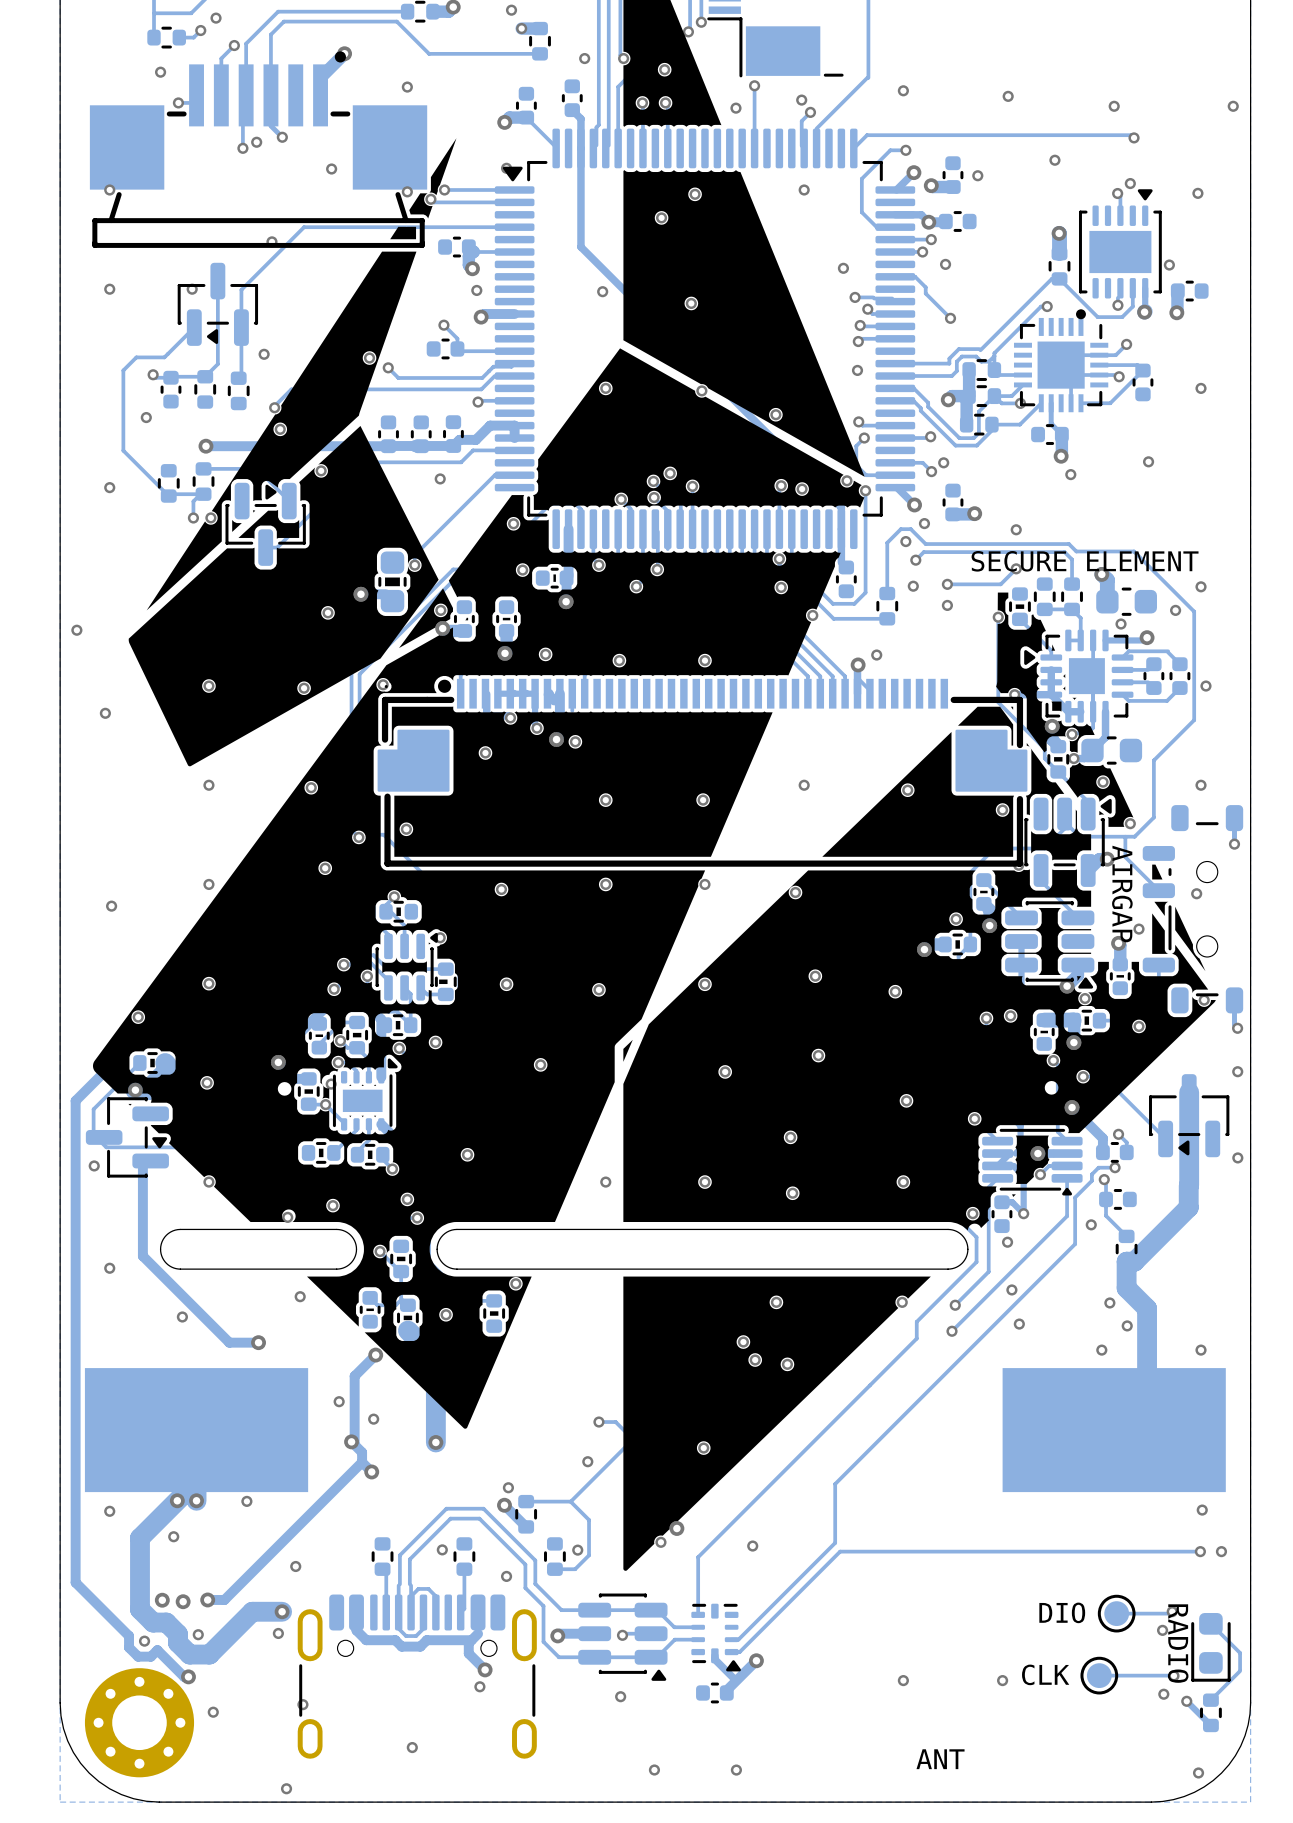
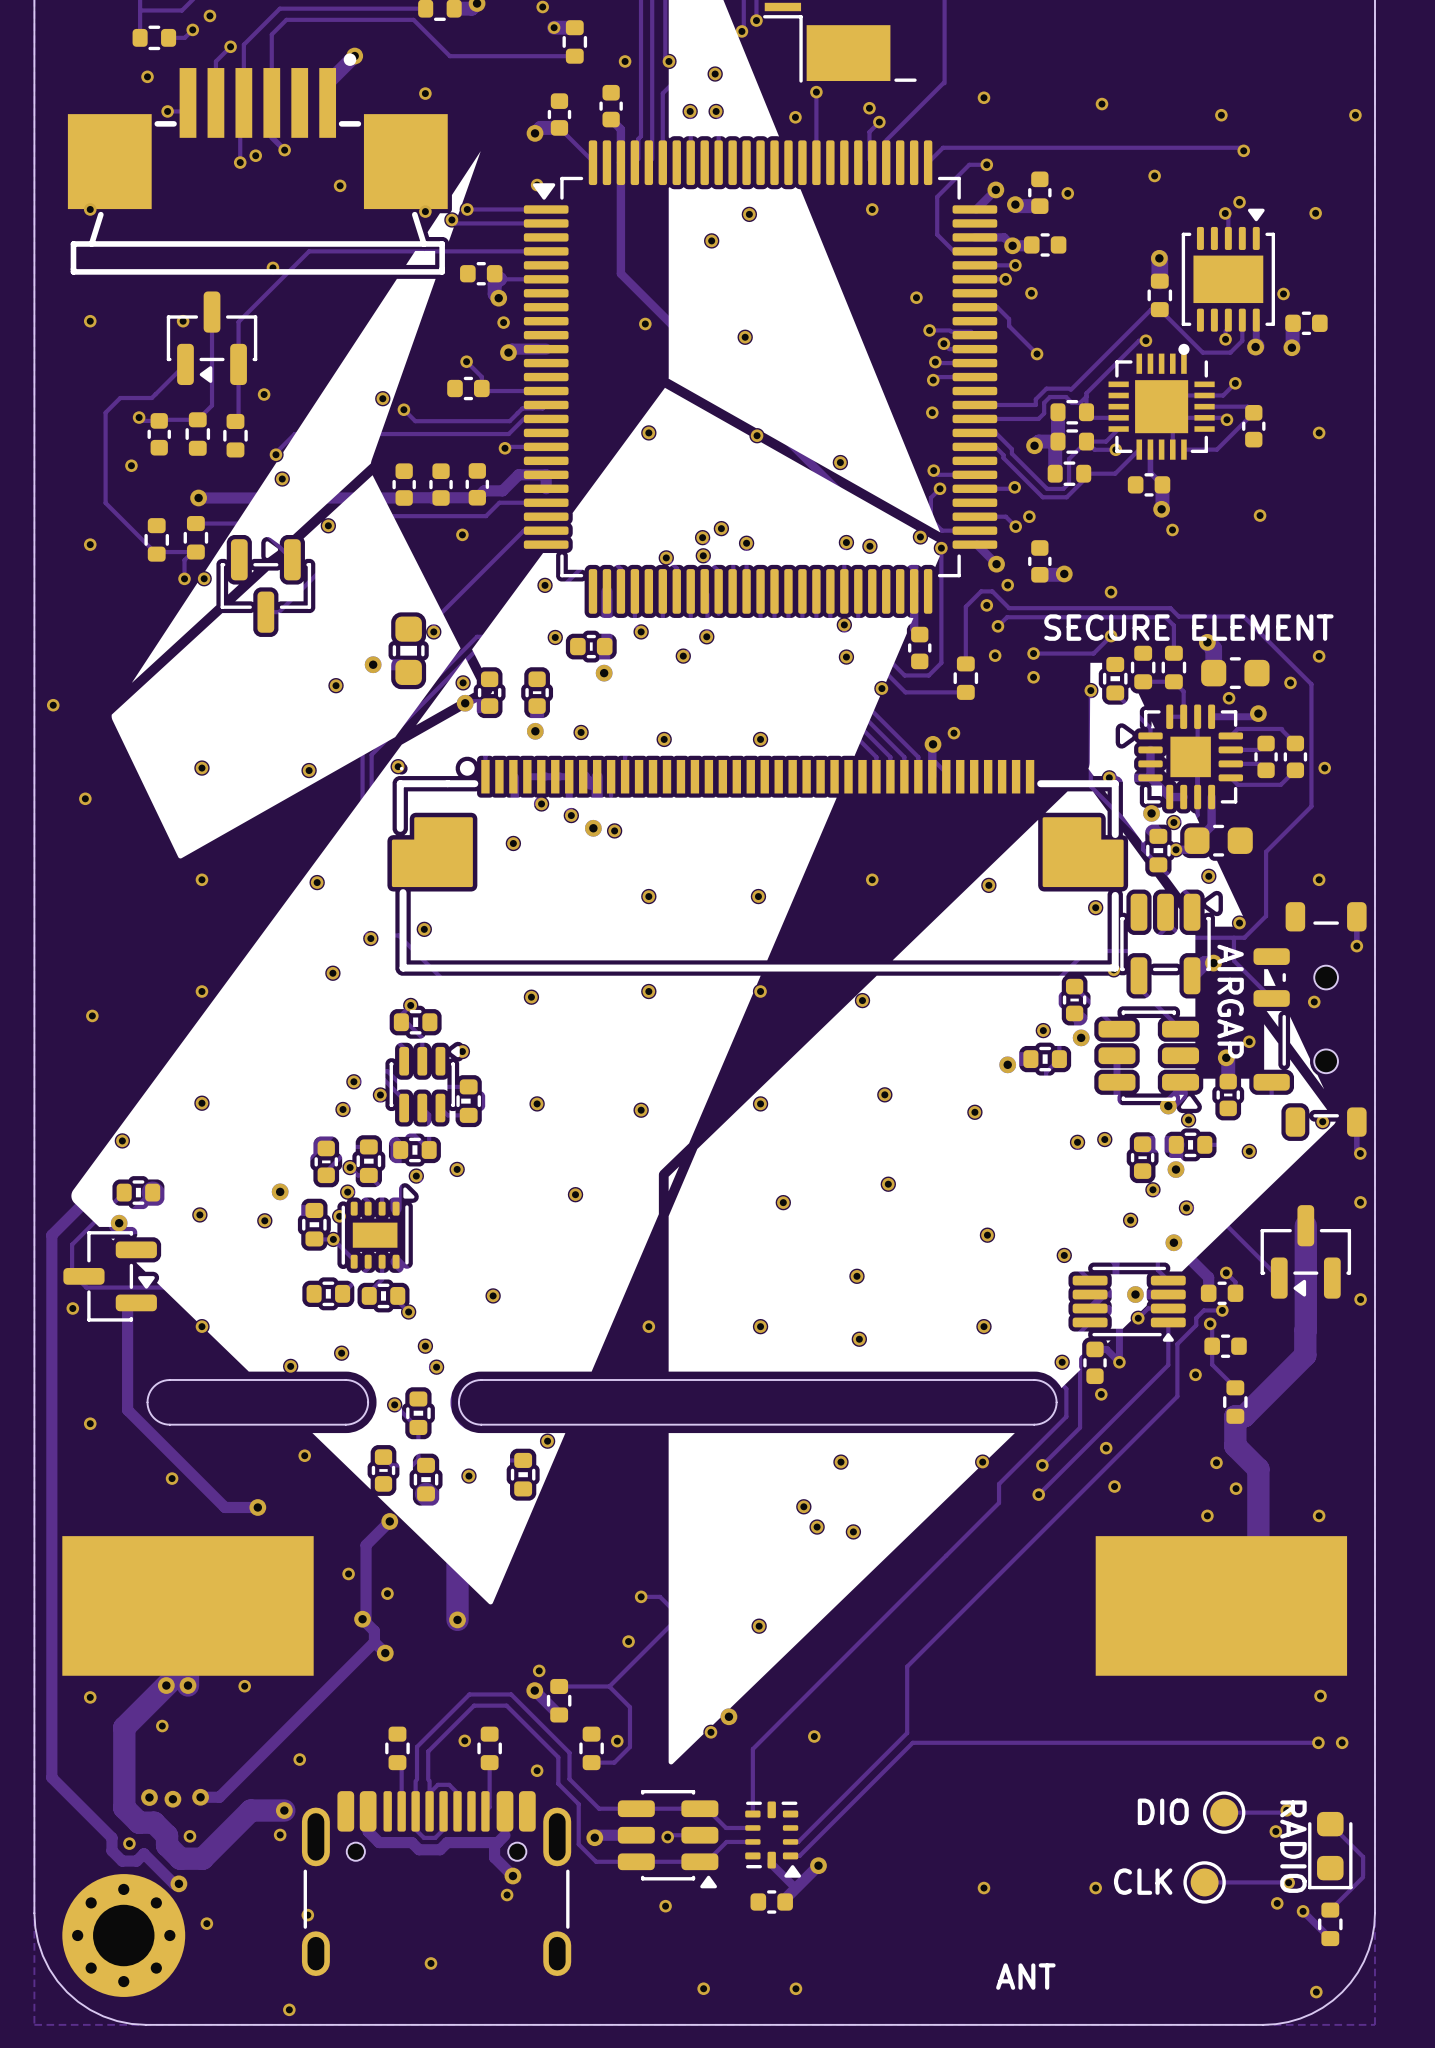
drawing shape: [92, 495, 841, 1429] -> [71, 553, 914, 1605]
drawing shape: [623, 869, 1216, 1231] -> [668, 974, 1336, 1389]
drawing: [322, 1085, 330, 1099] -> none

